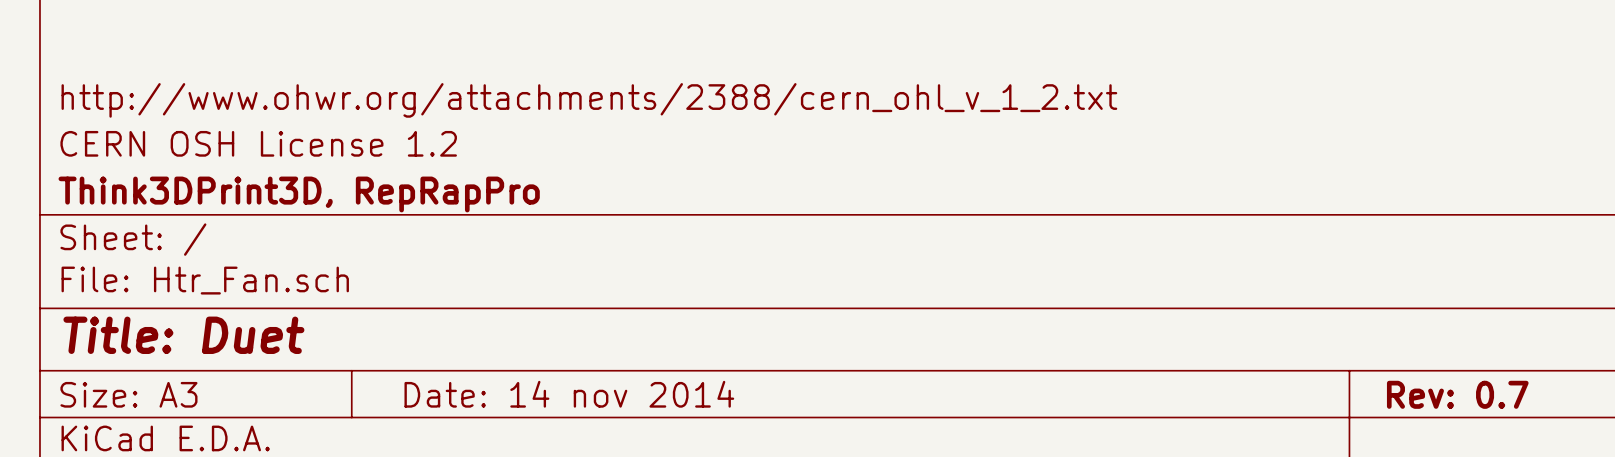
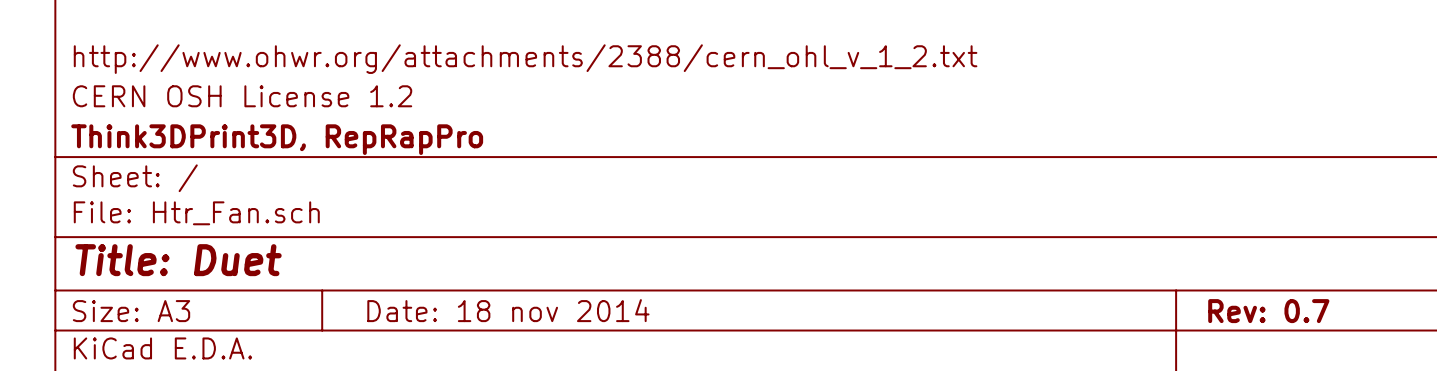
title block: Date: 14 nov 2014 (569, 394) -> Date: 18 nov 2014 (508, 310)

